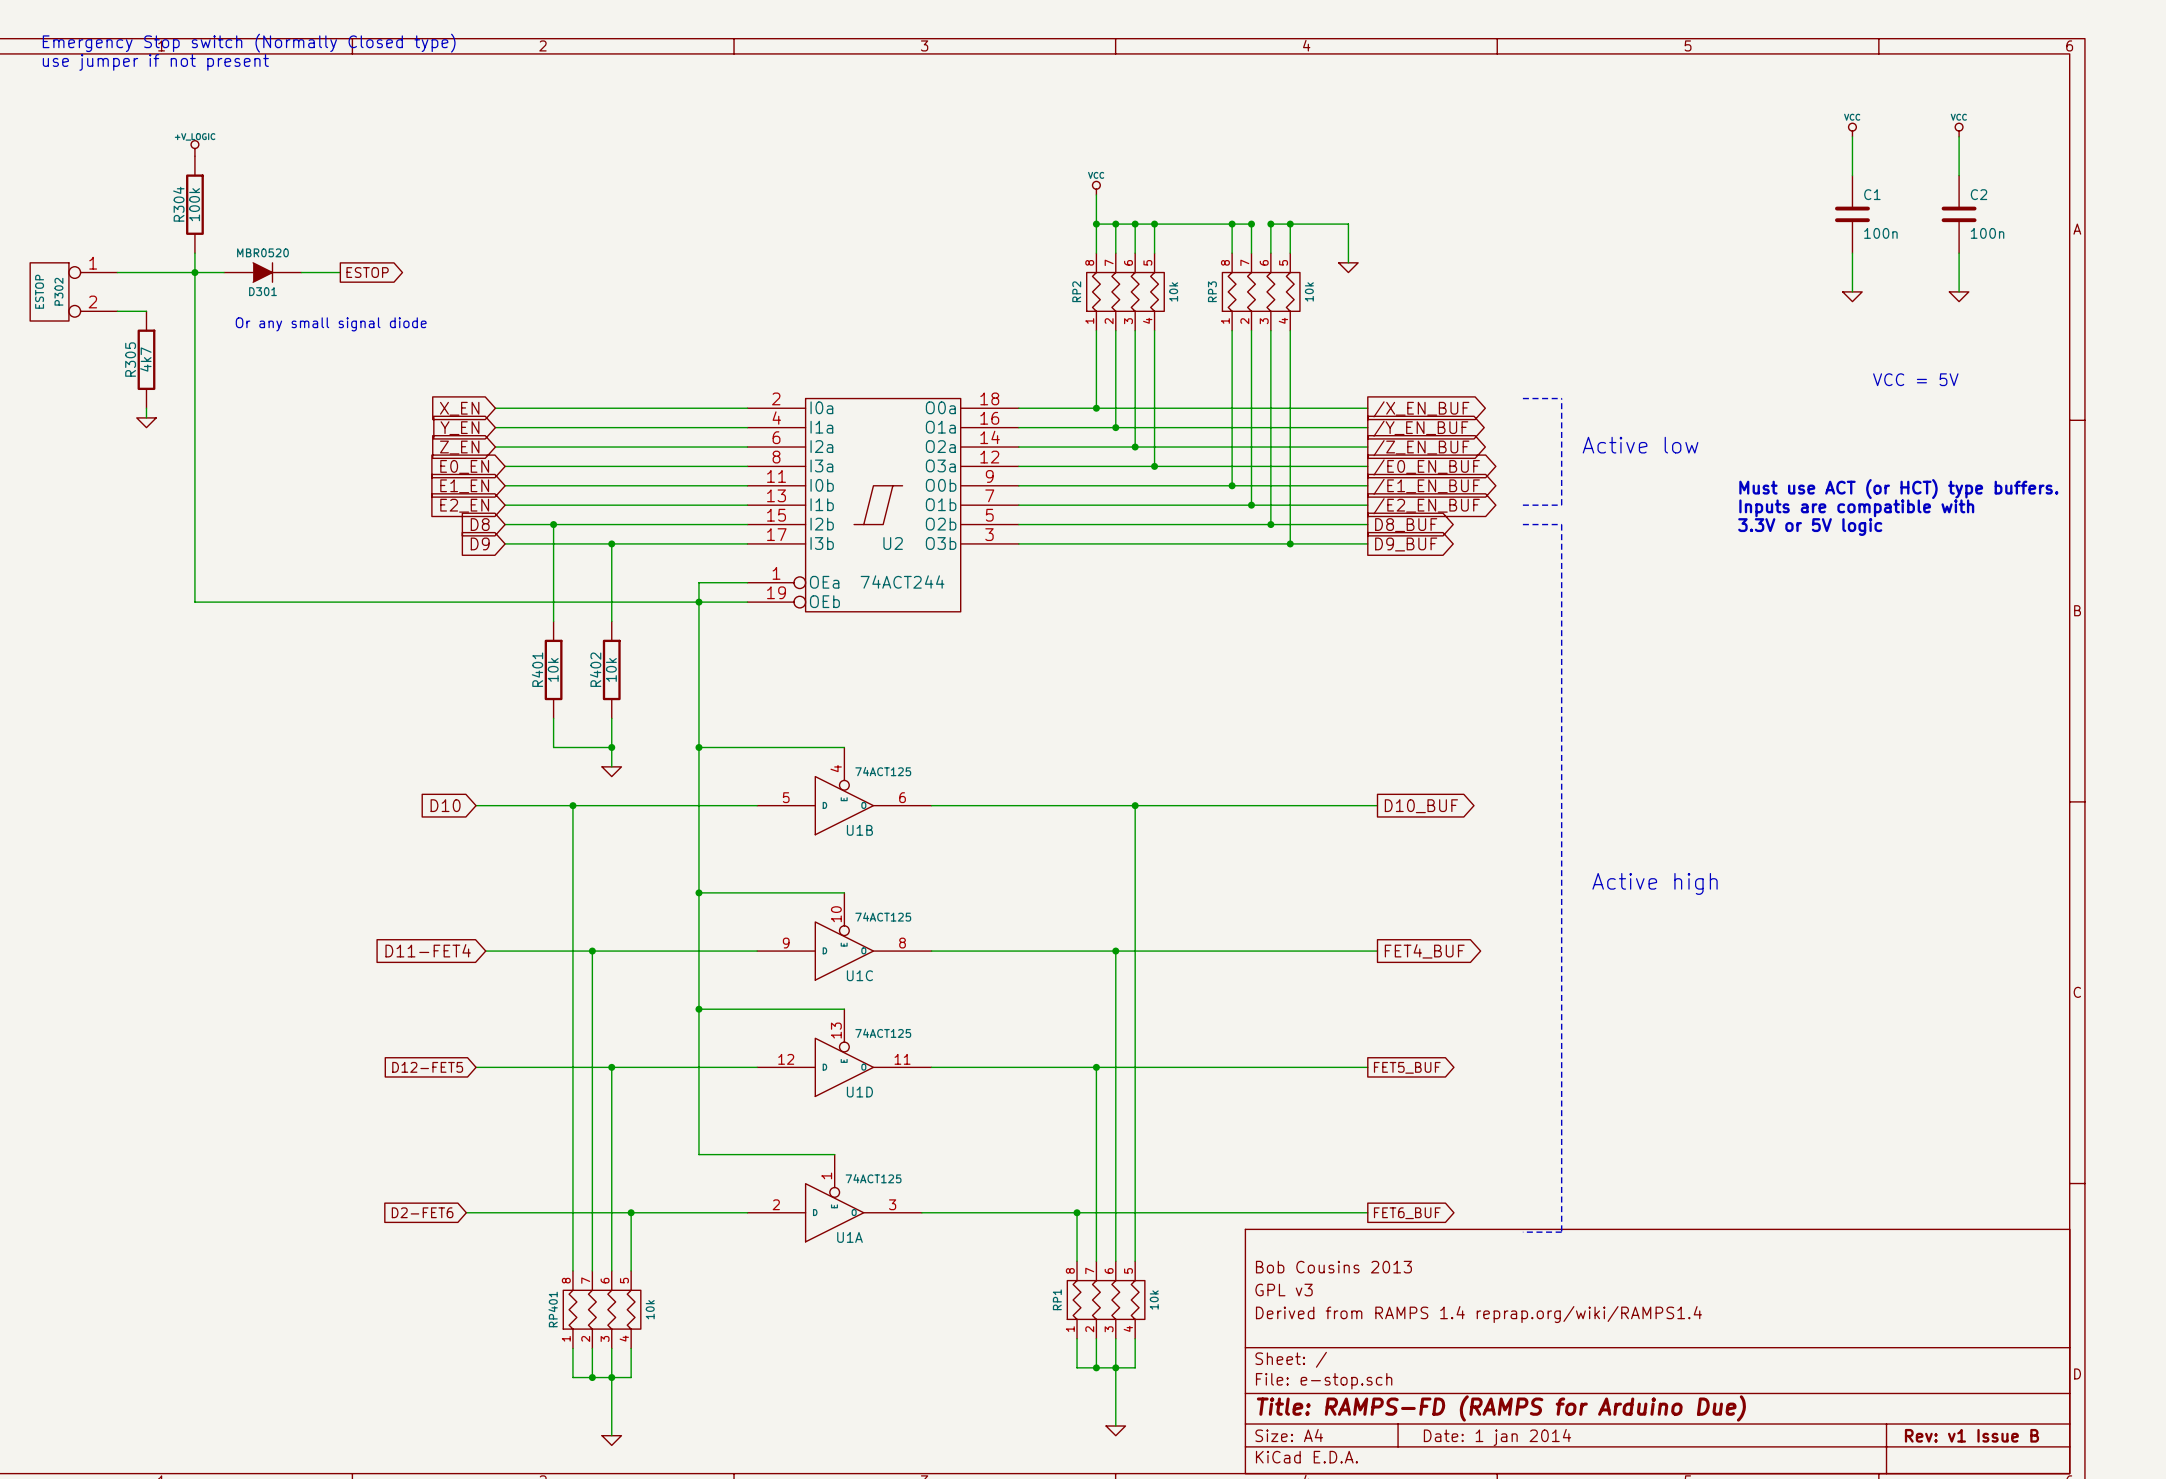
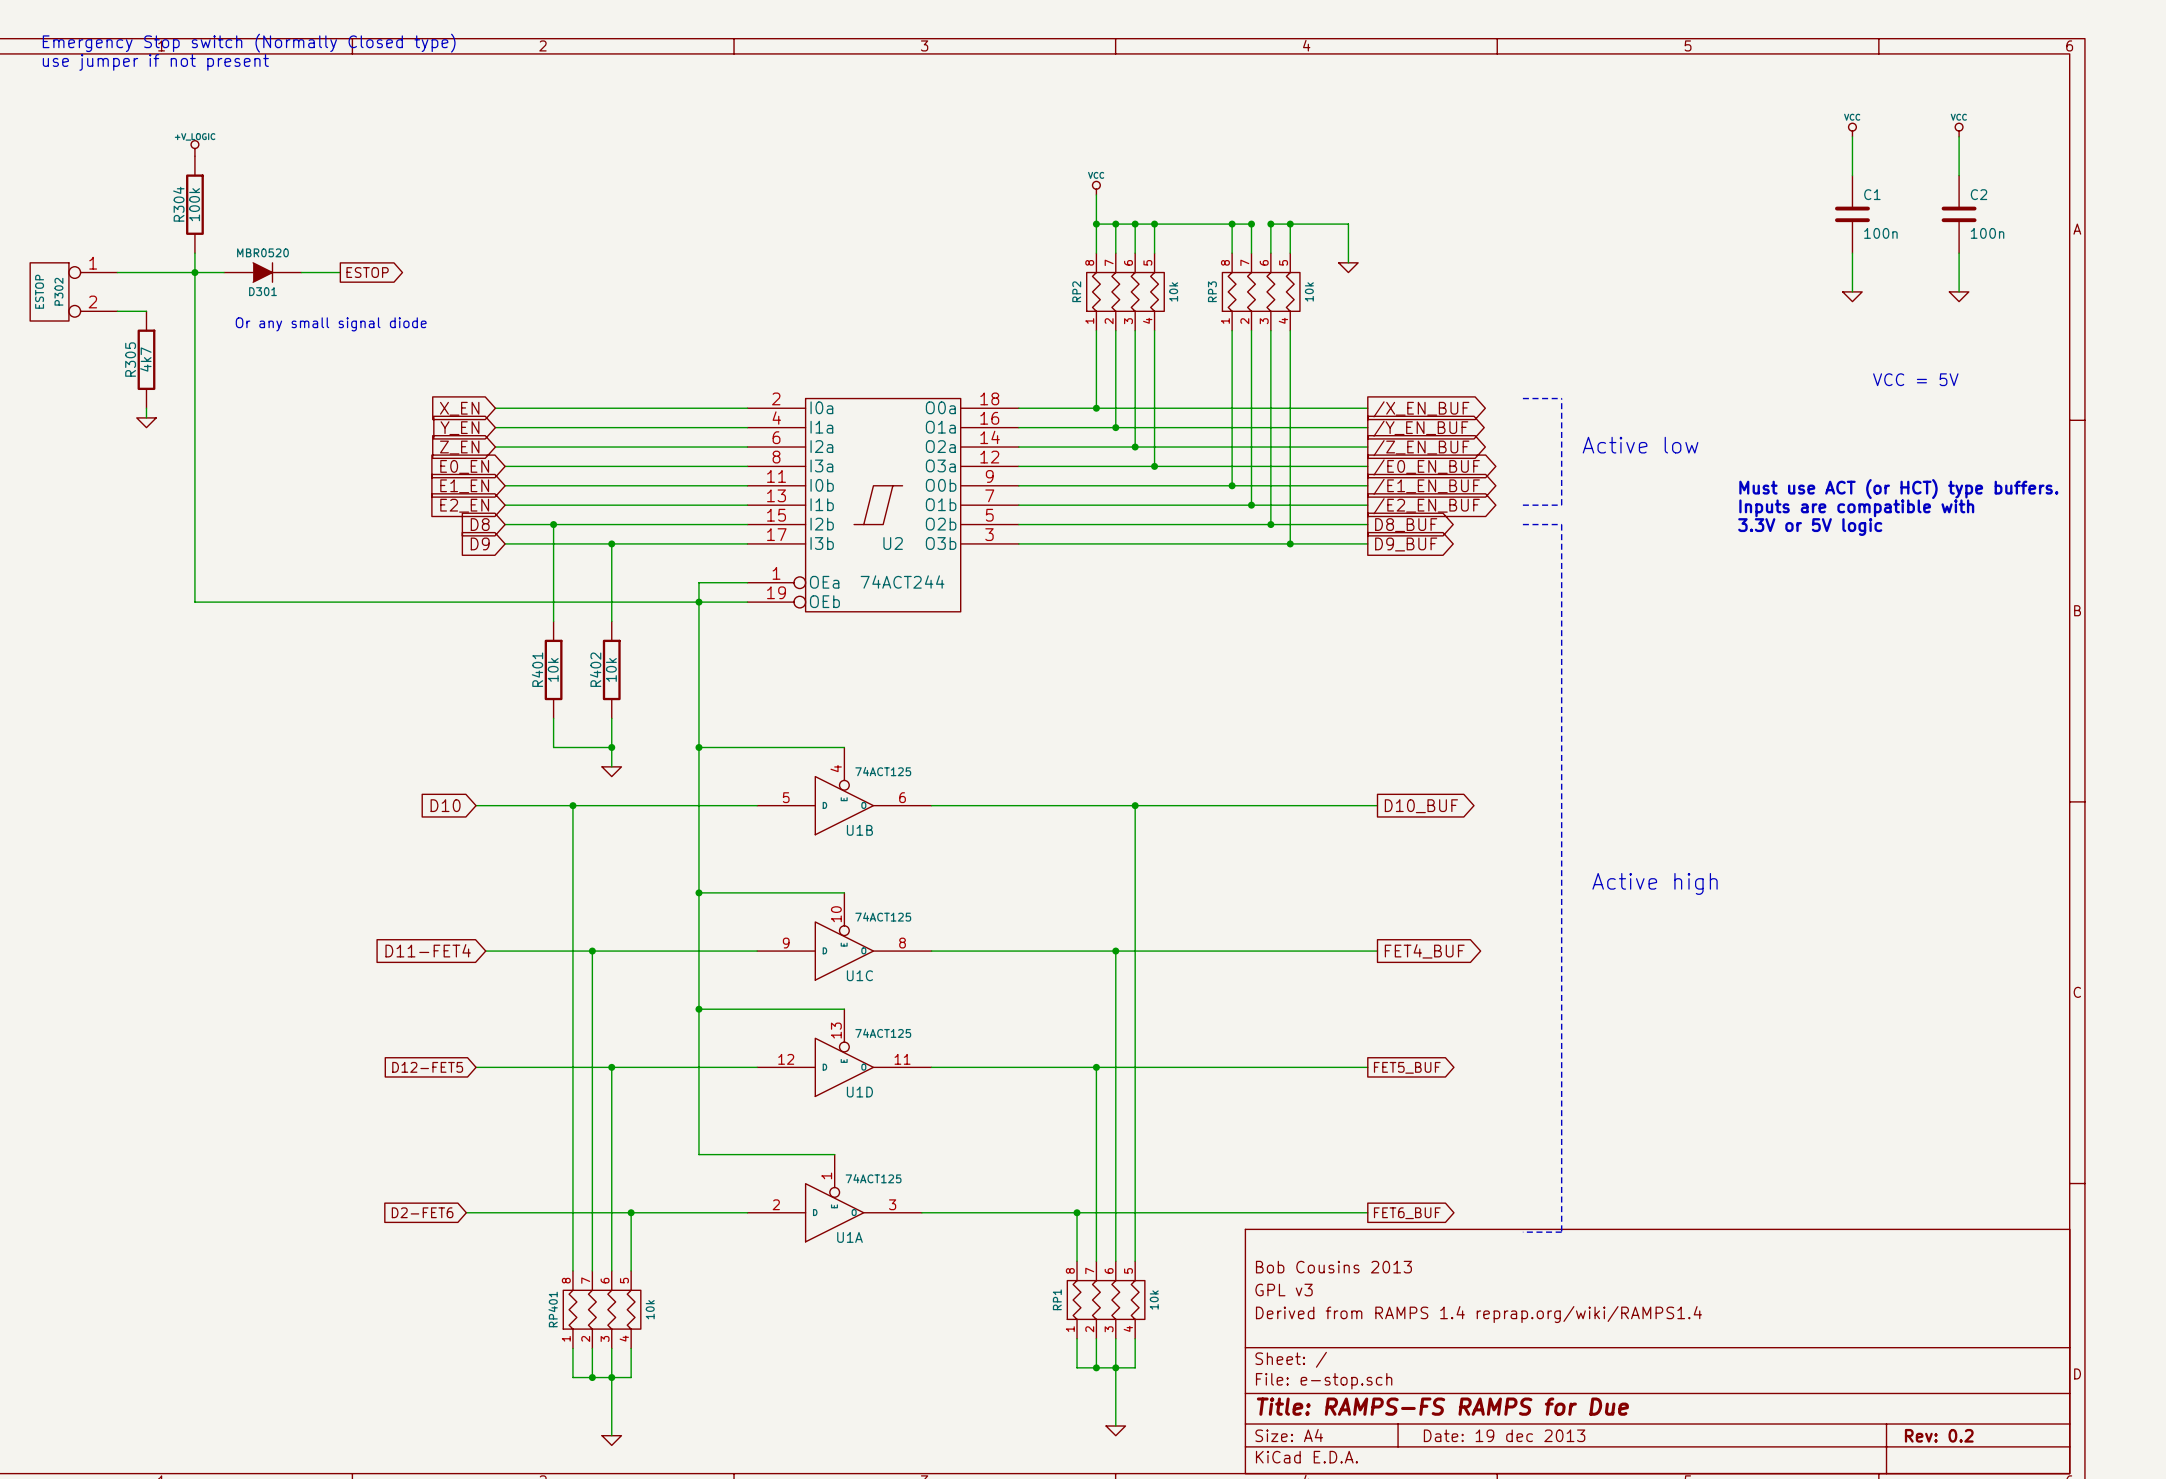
title block: Title: RAMPS-FD (RAMPS for Arduino Due) (1501, 1408) -> Title: RAMPS-FS RAMPS for Due (1442, 1406)
title block: Rev: v1 Issue B (1971, 1435) -> Rev: 0.2 (1939, 1435)
title block: Date: 1 jan 2014 (1497, 1437) -> Date: 19 dec 2013 (1504, 1435)

